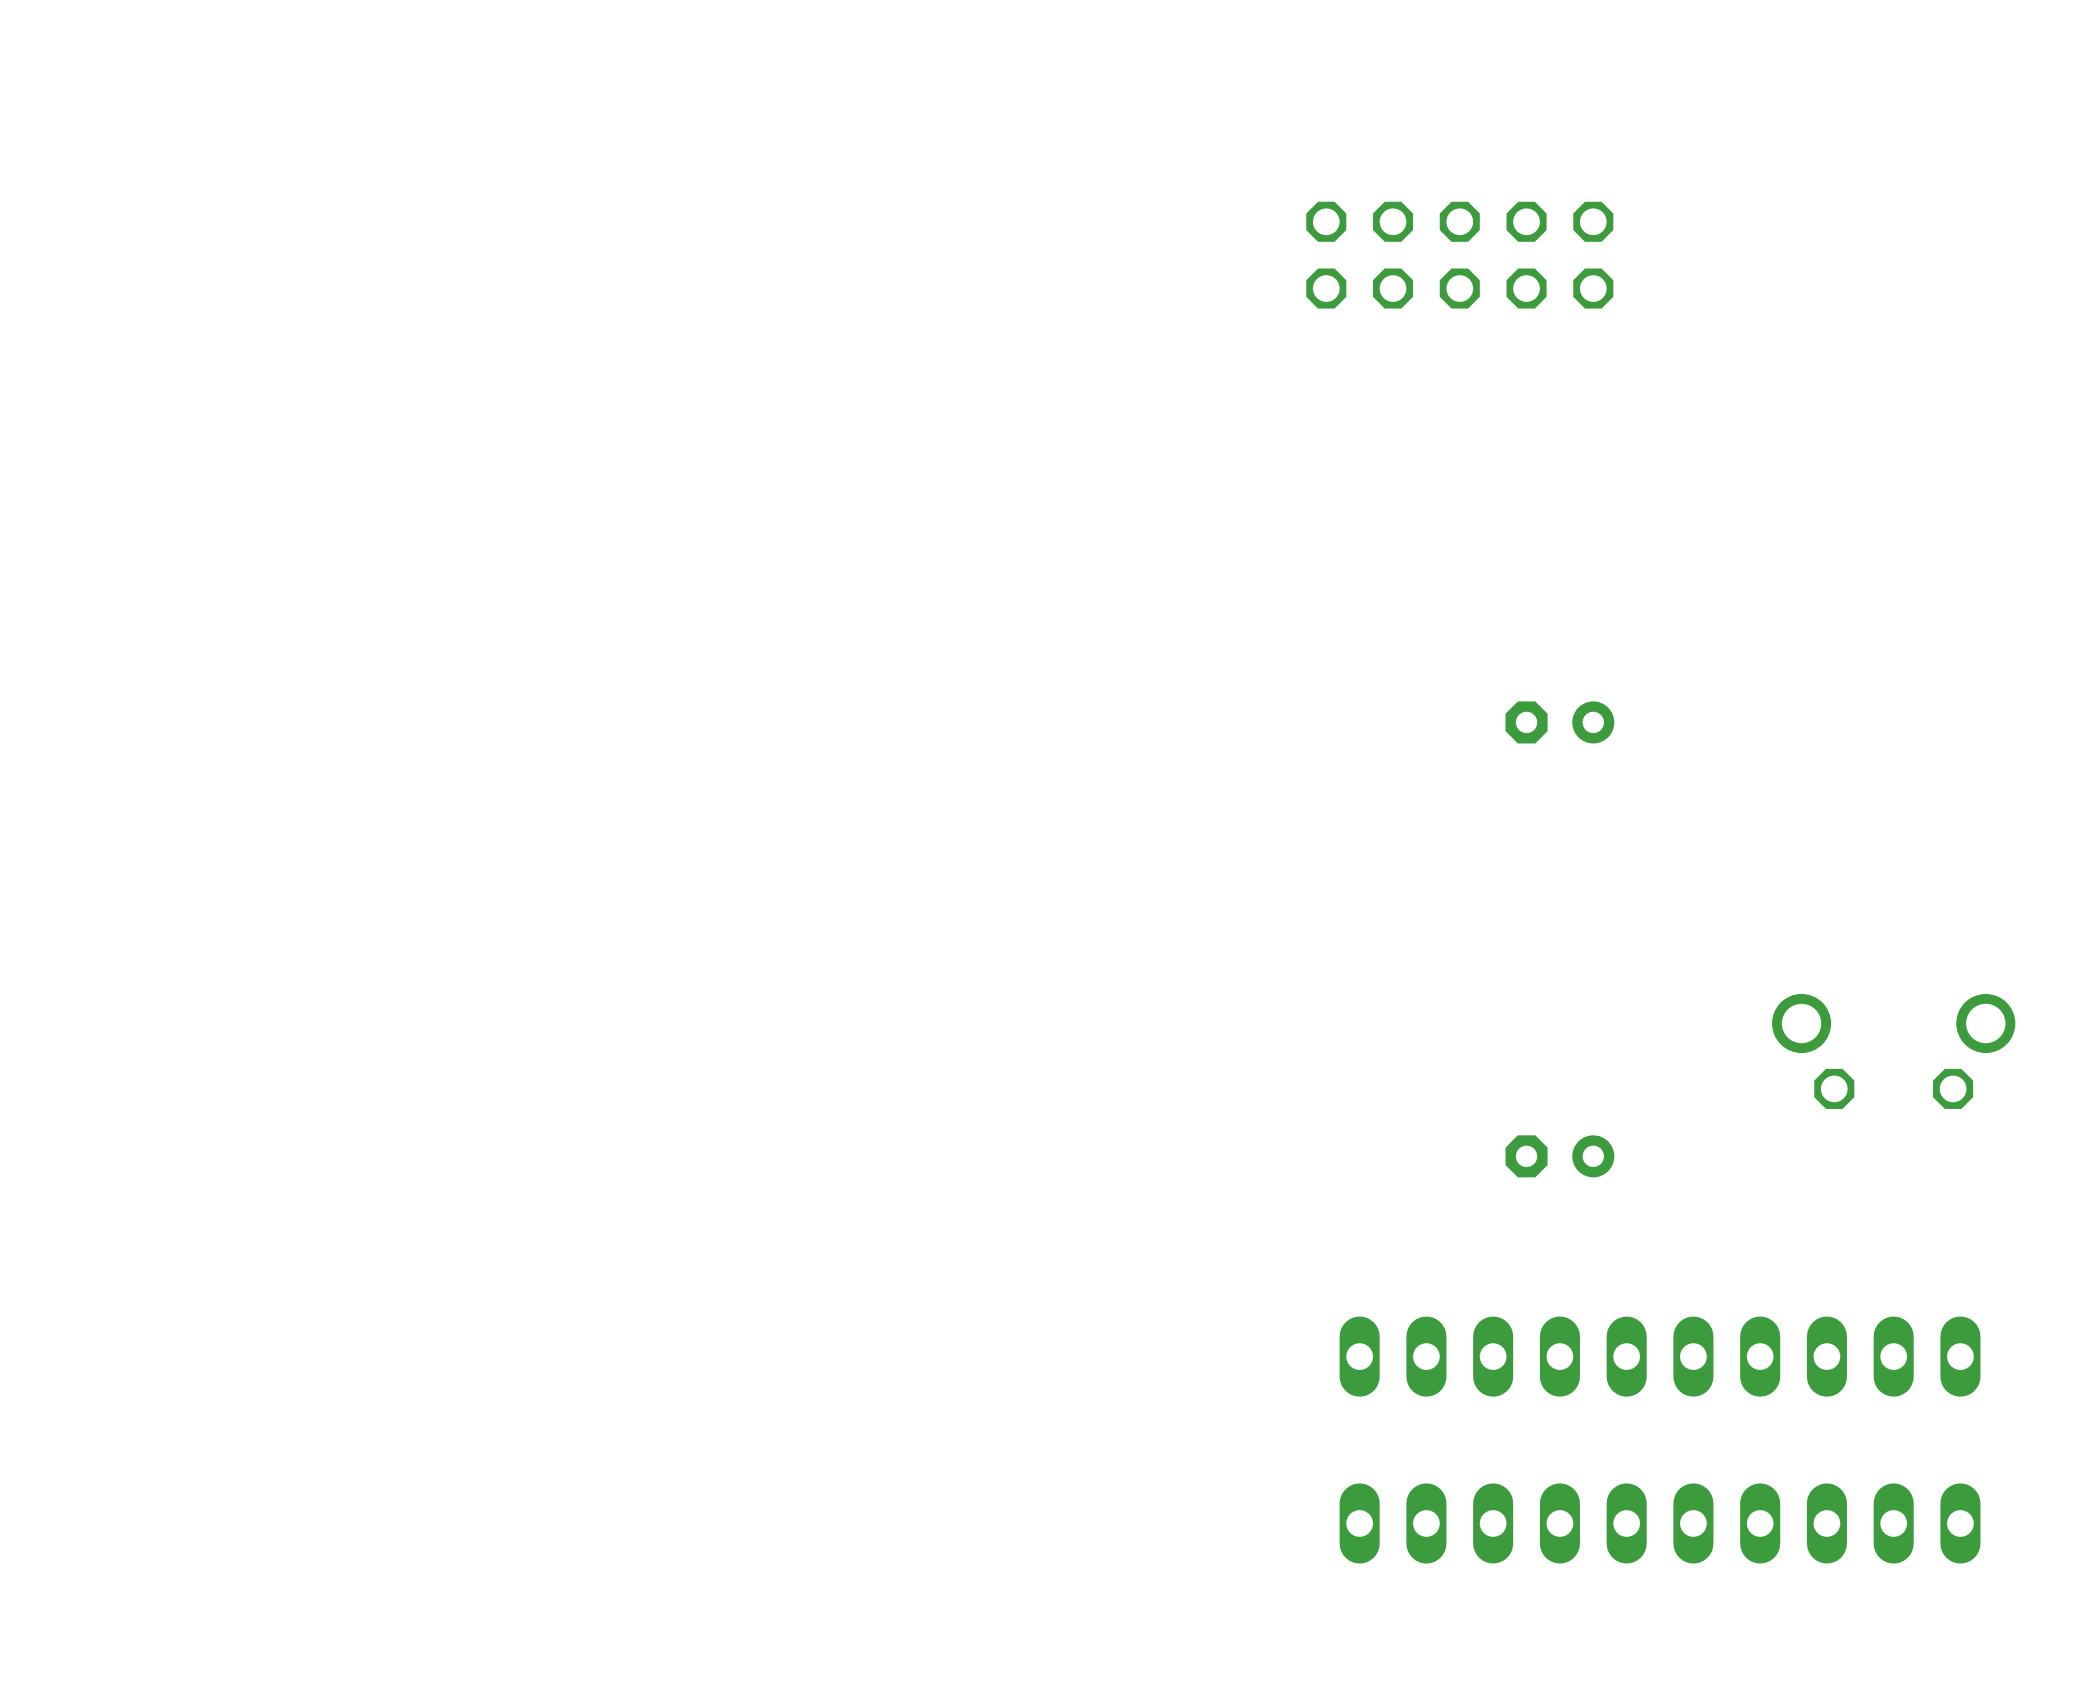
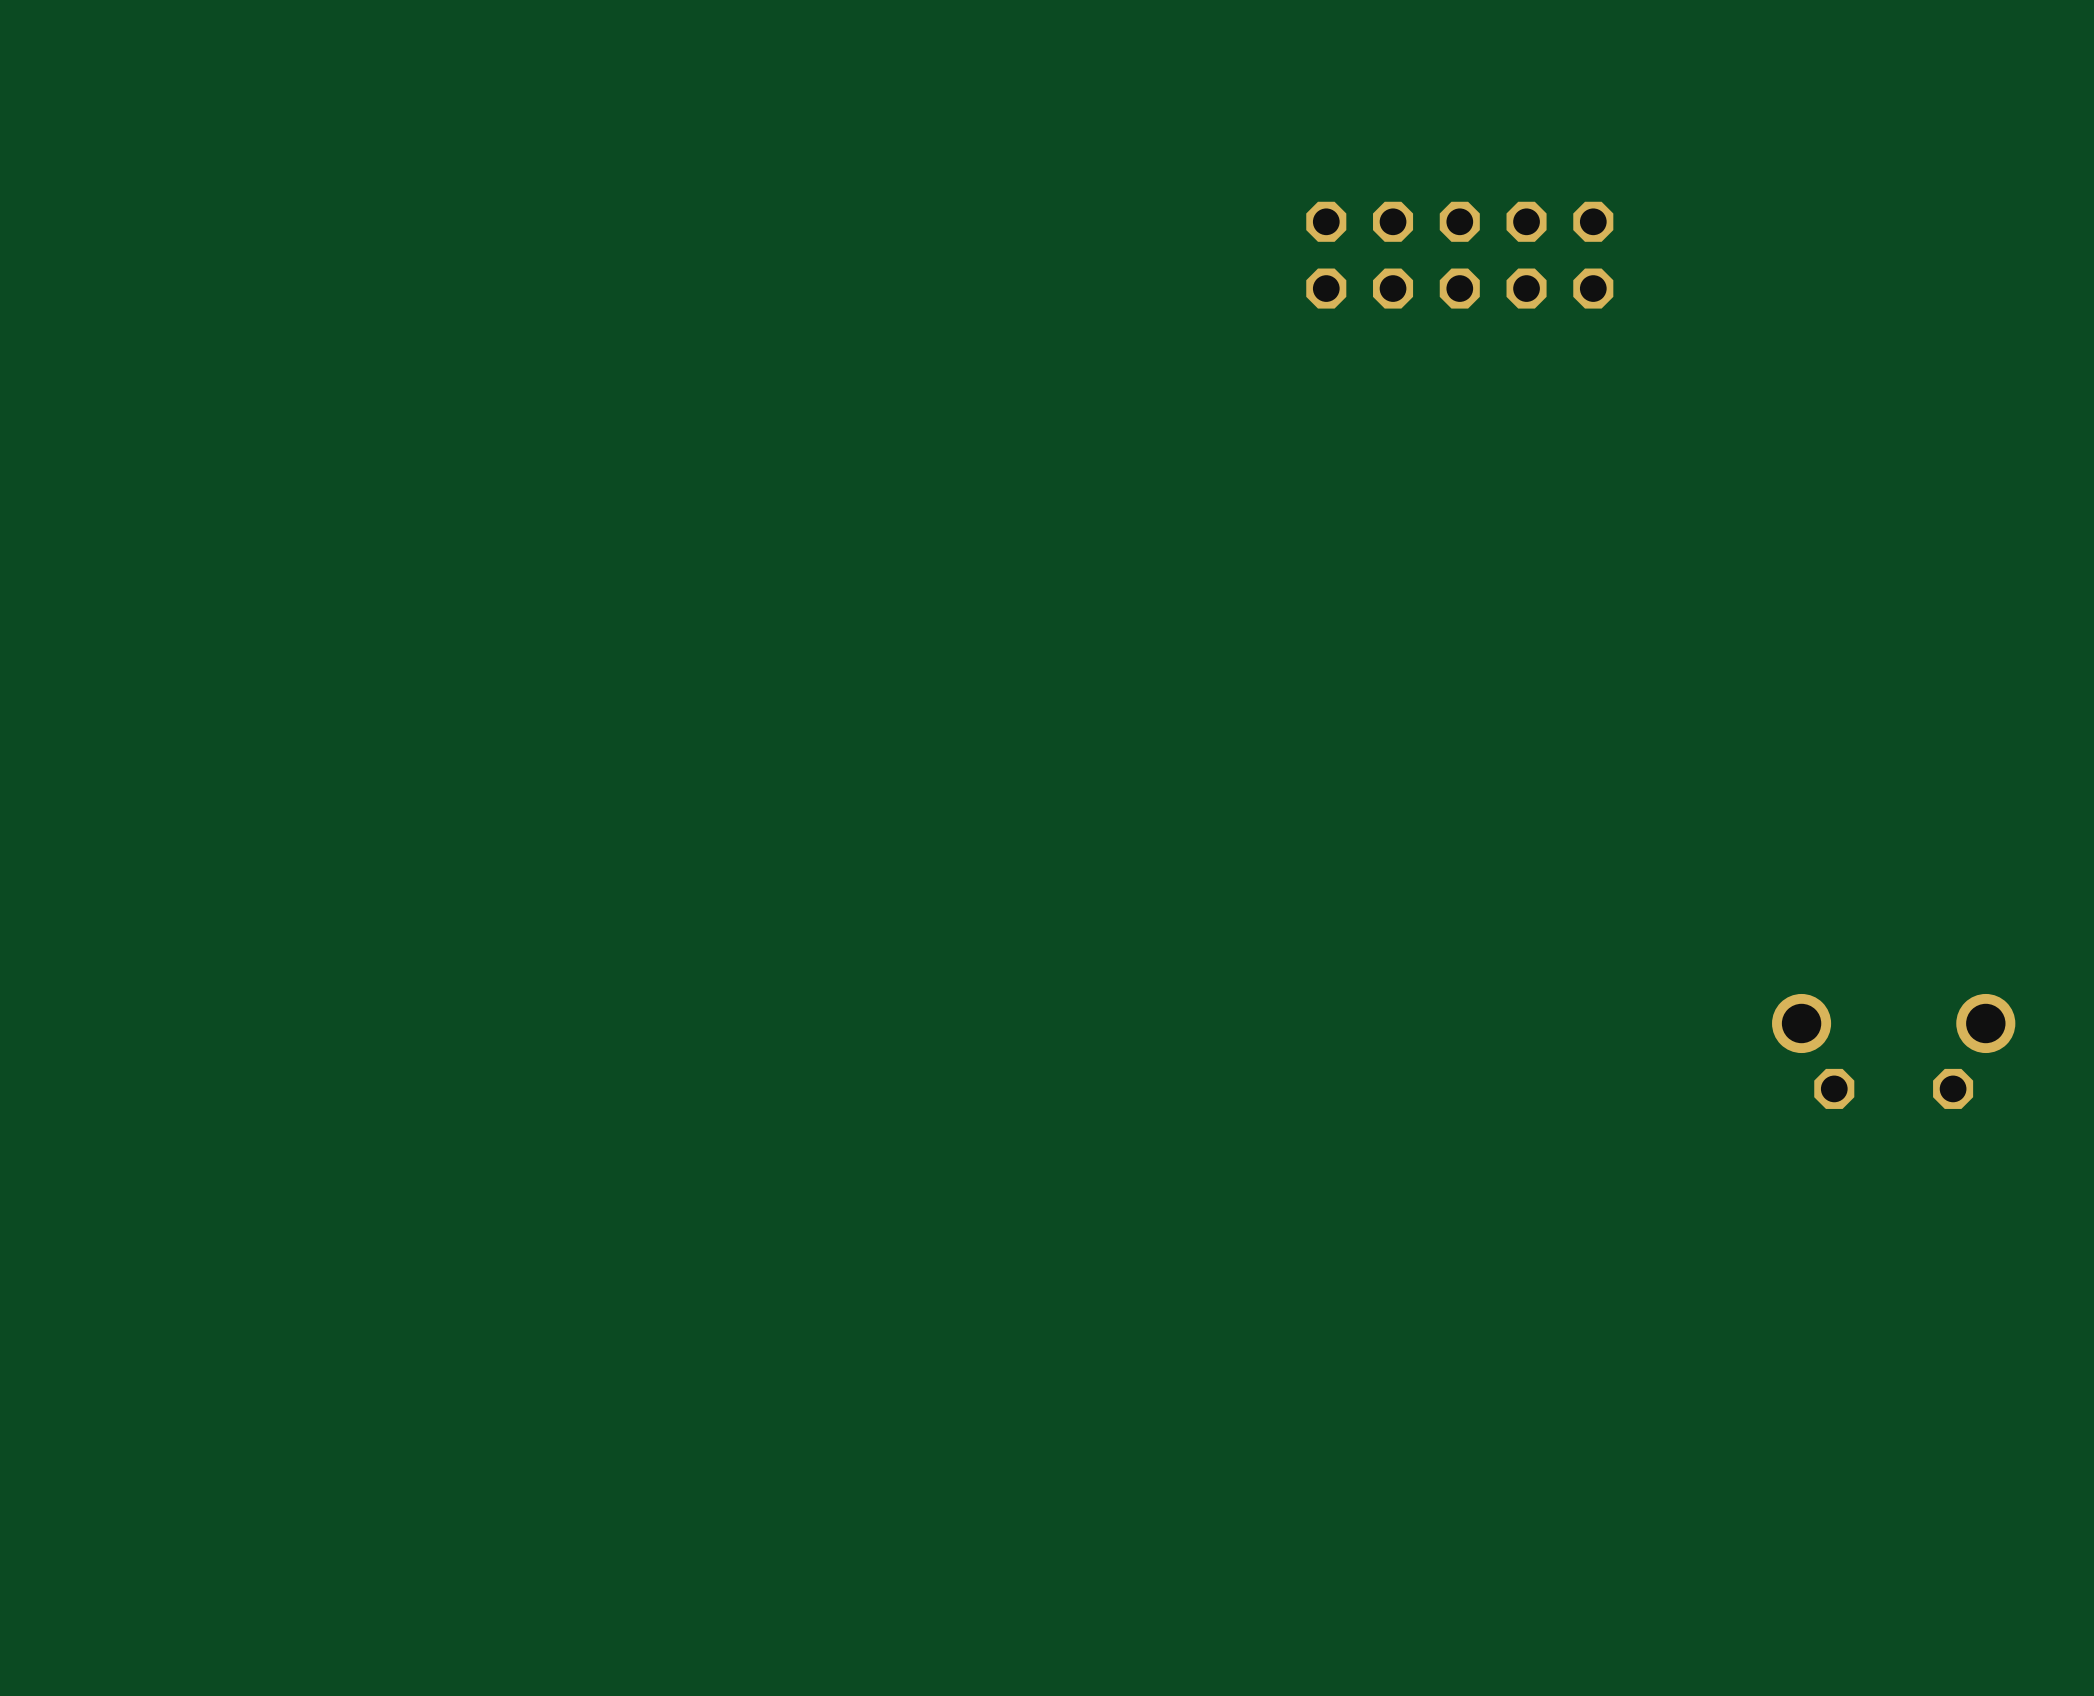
part: (1559, 722) -> none
part: (1559, 1156) -> none
part: (1660, 1356) -> none
part: (1660, 1523) -> none

